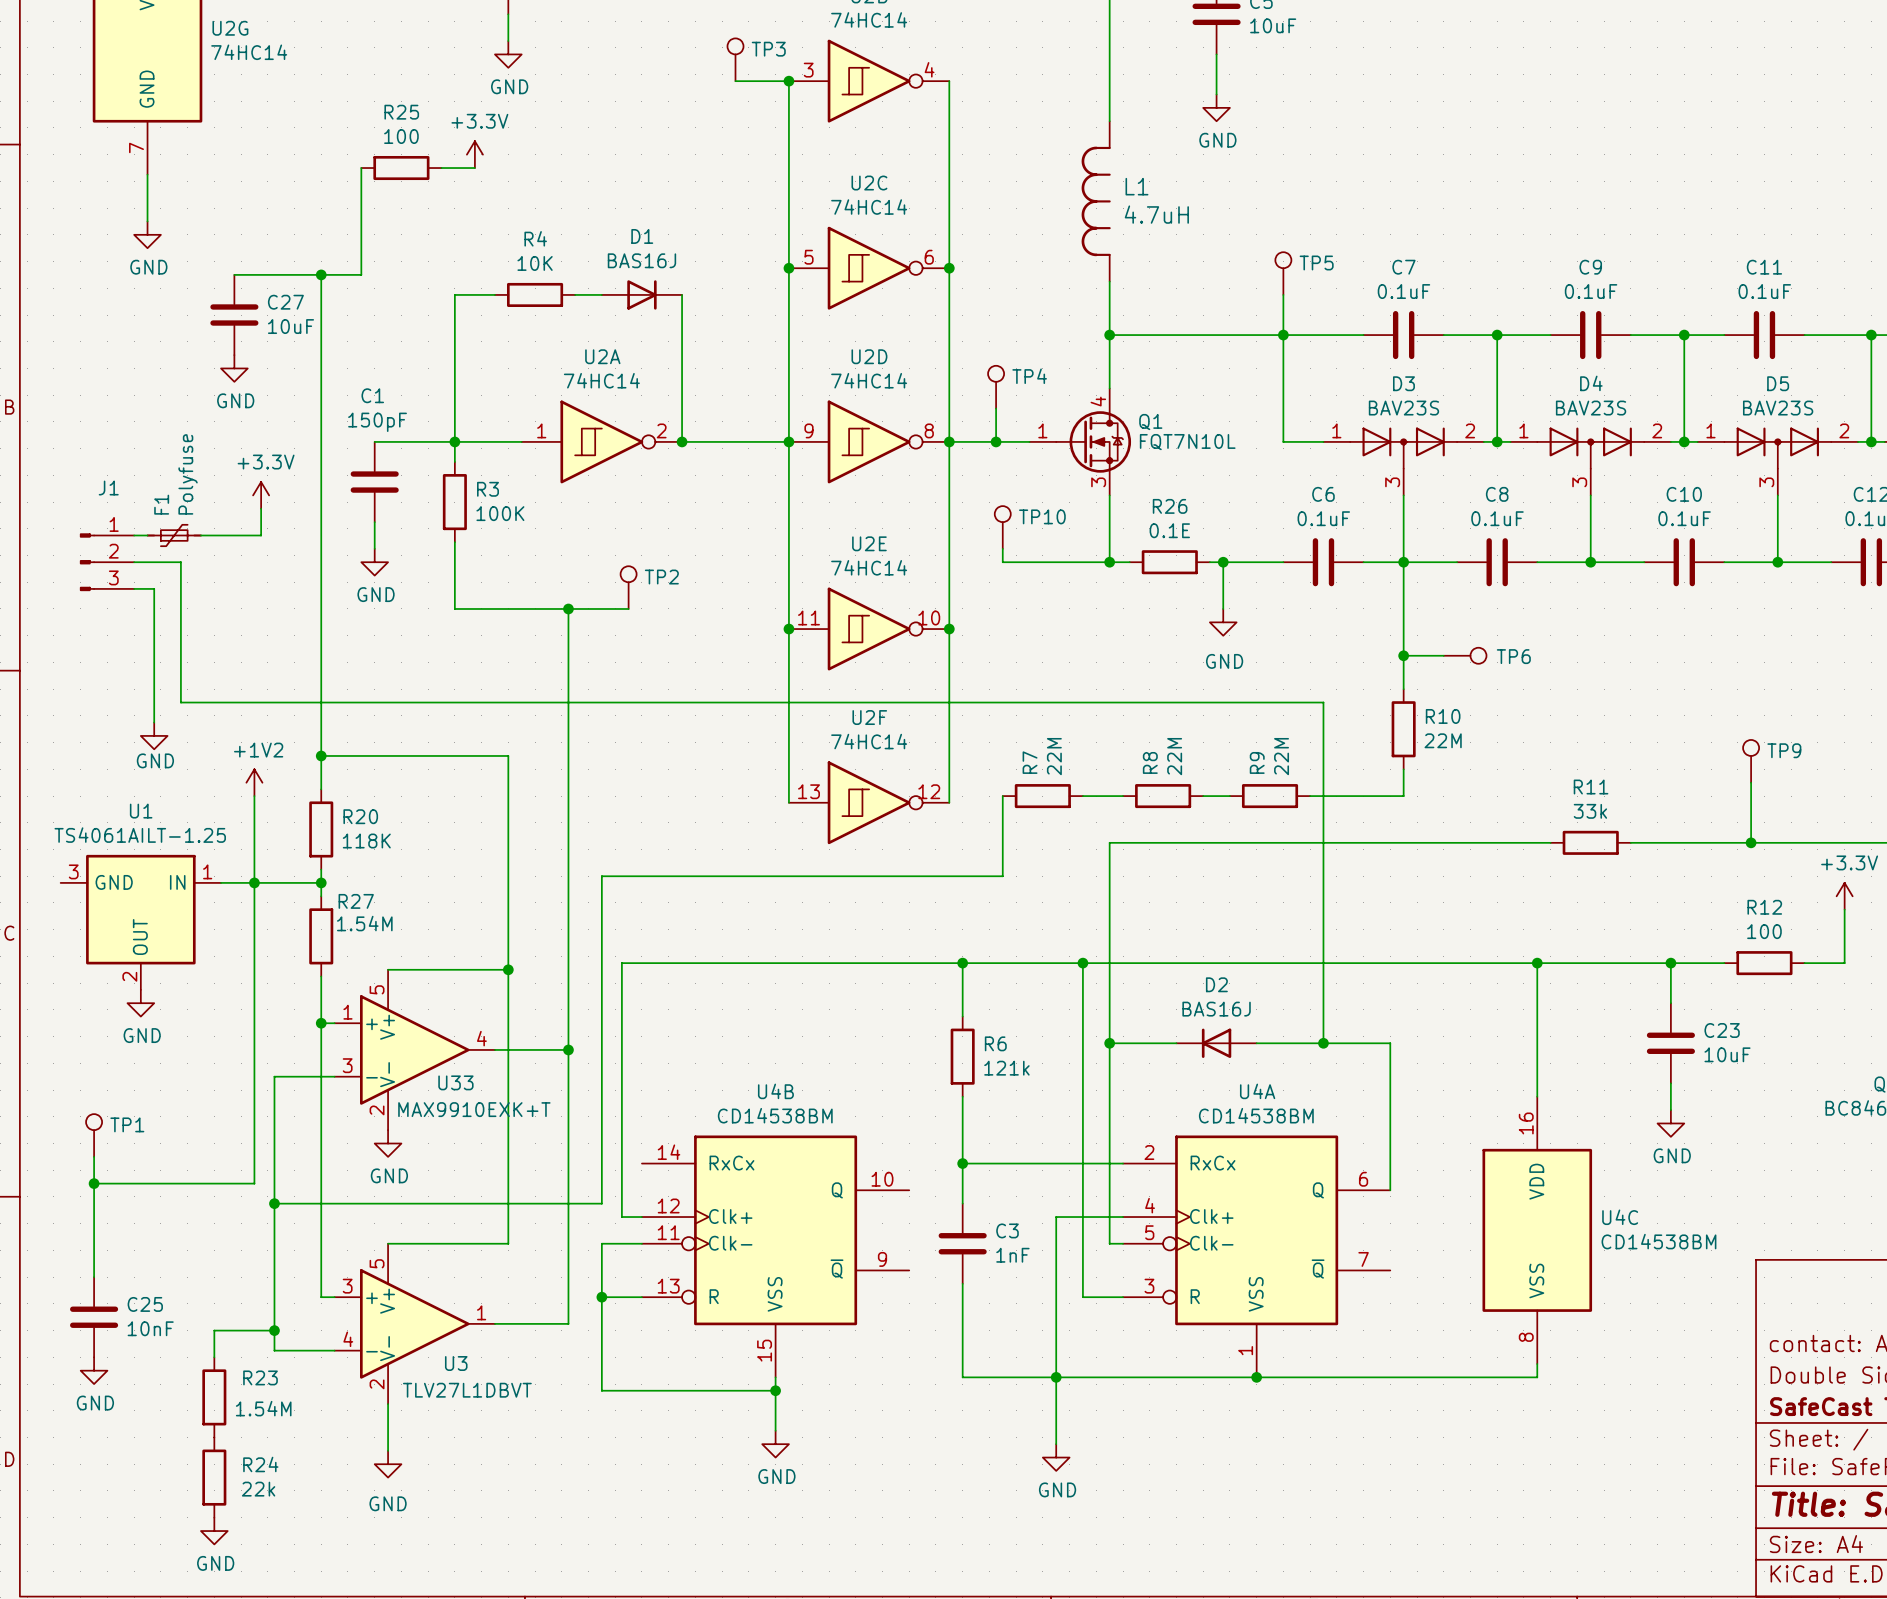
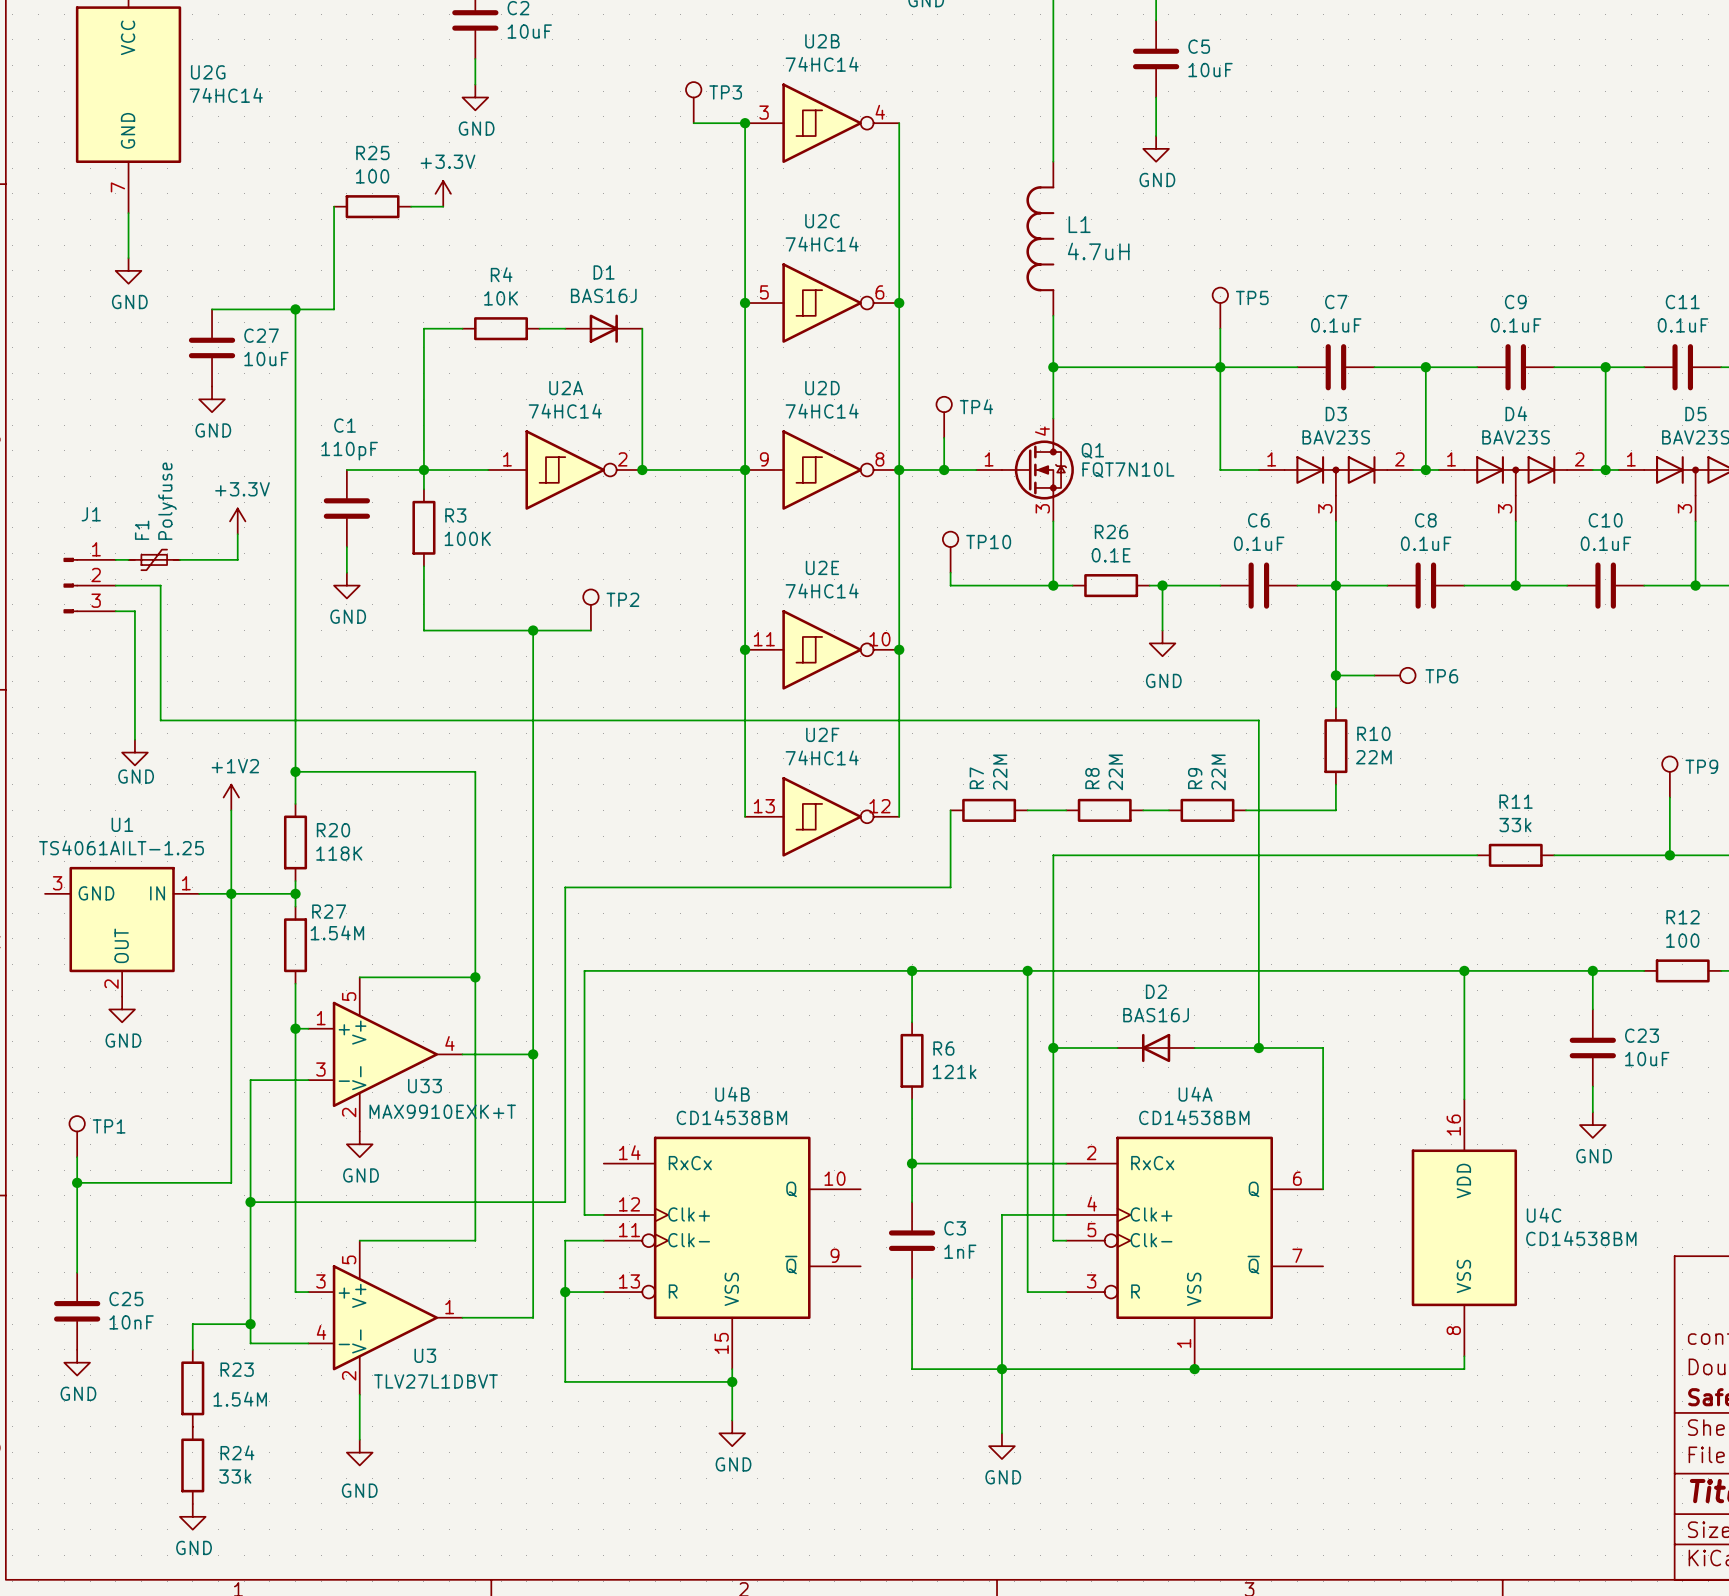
C1 value: 150pF (377, 422) -> 110pF (349, 451)
R24 value: 22k (258, 1489) -> 33k (235, 1476)

